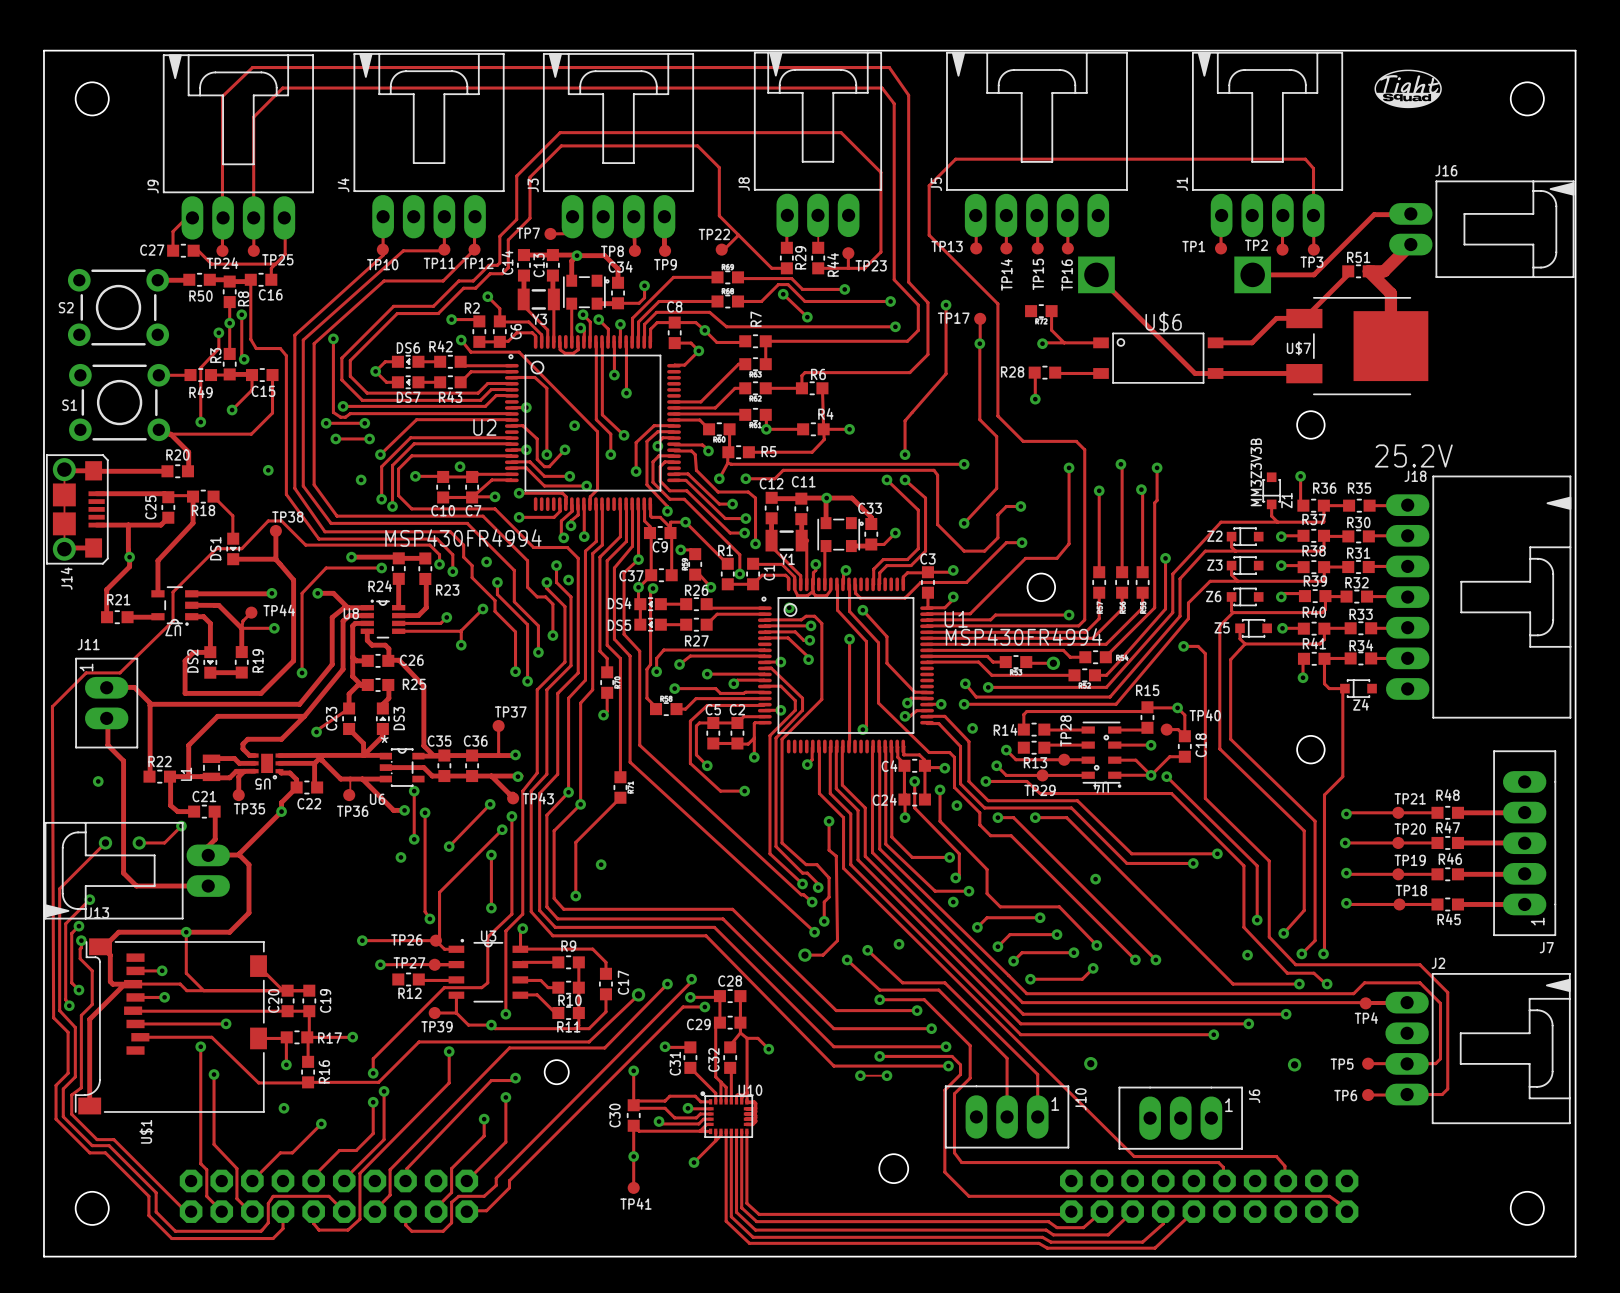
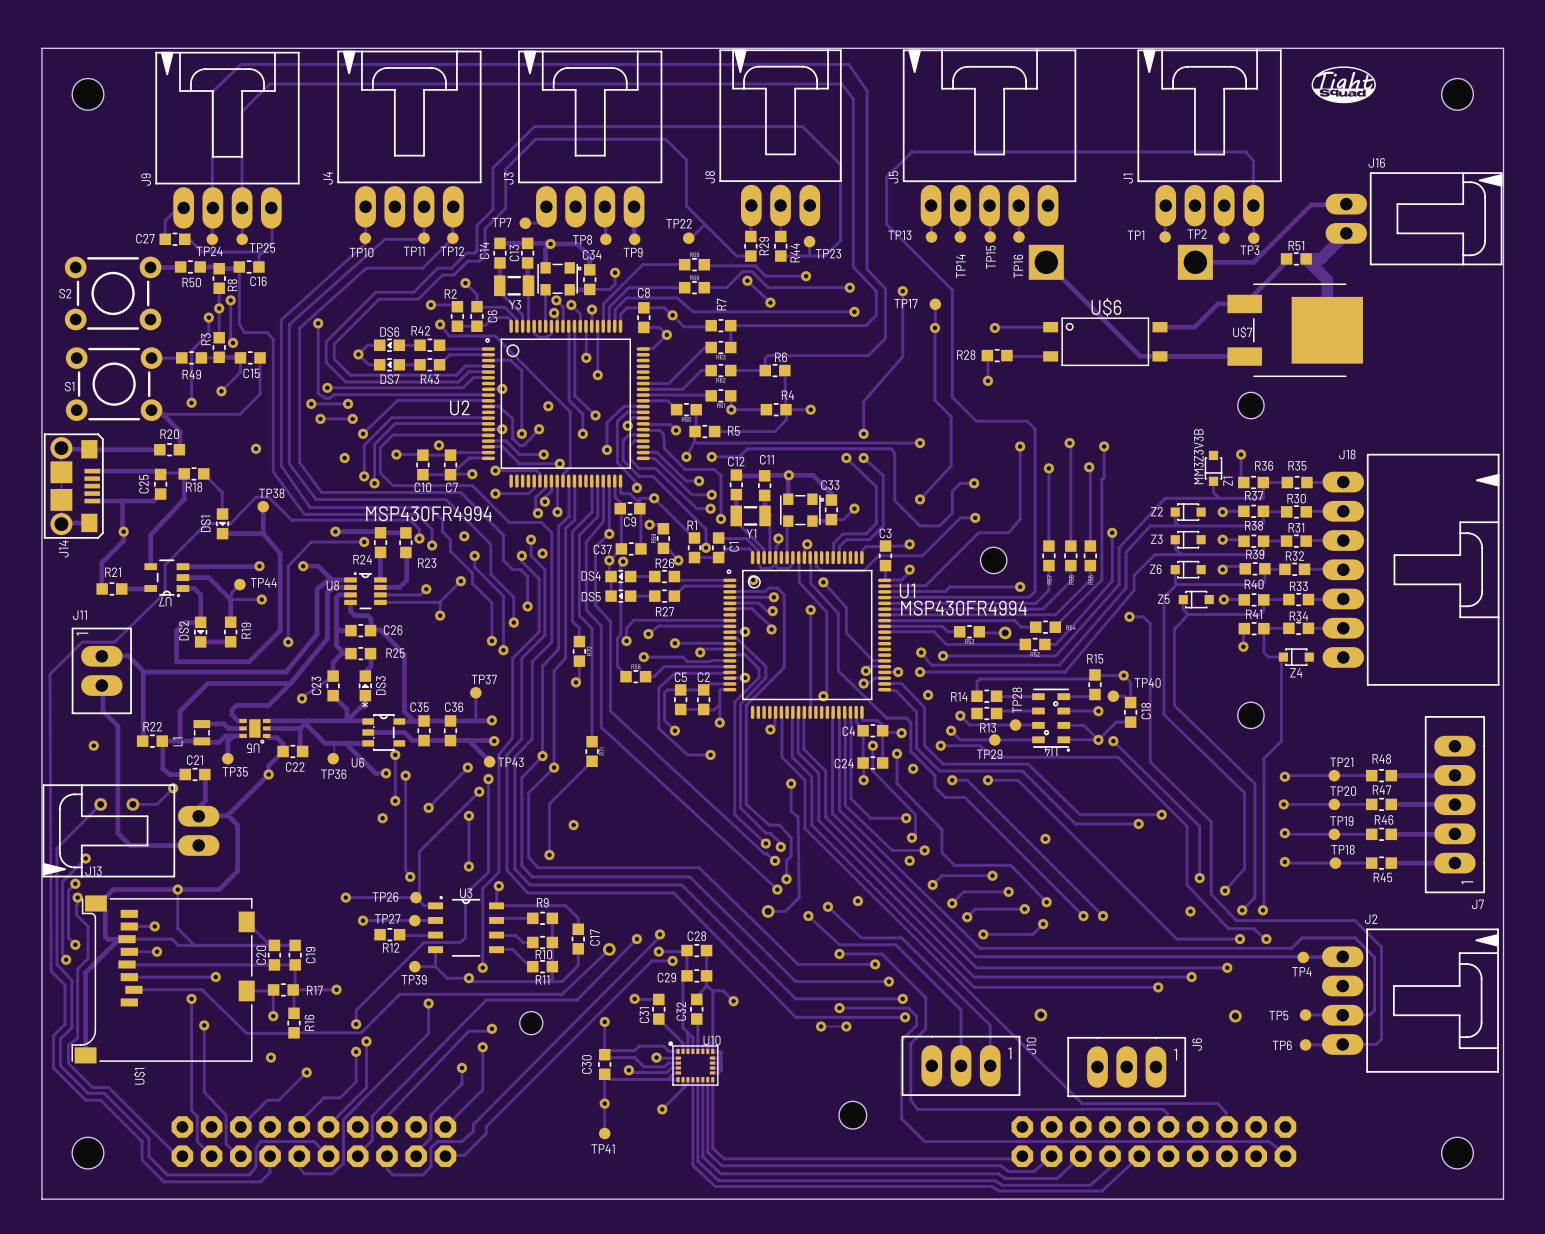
part: (1041, 311) -> none
track: (1051, 311) (1051, 330) (1064, 342) -> none
text: 25.2V (1413, 455) -> none

